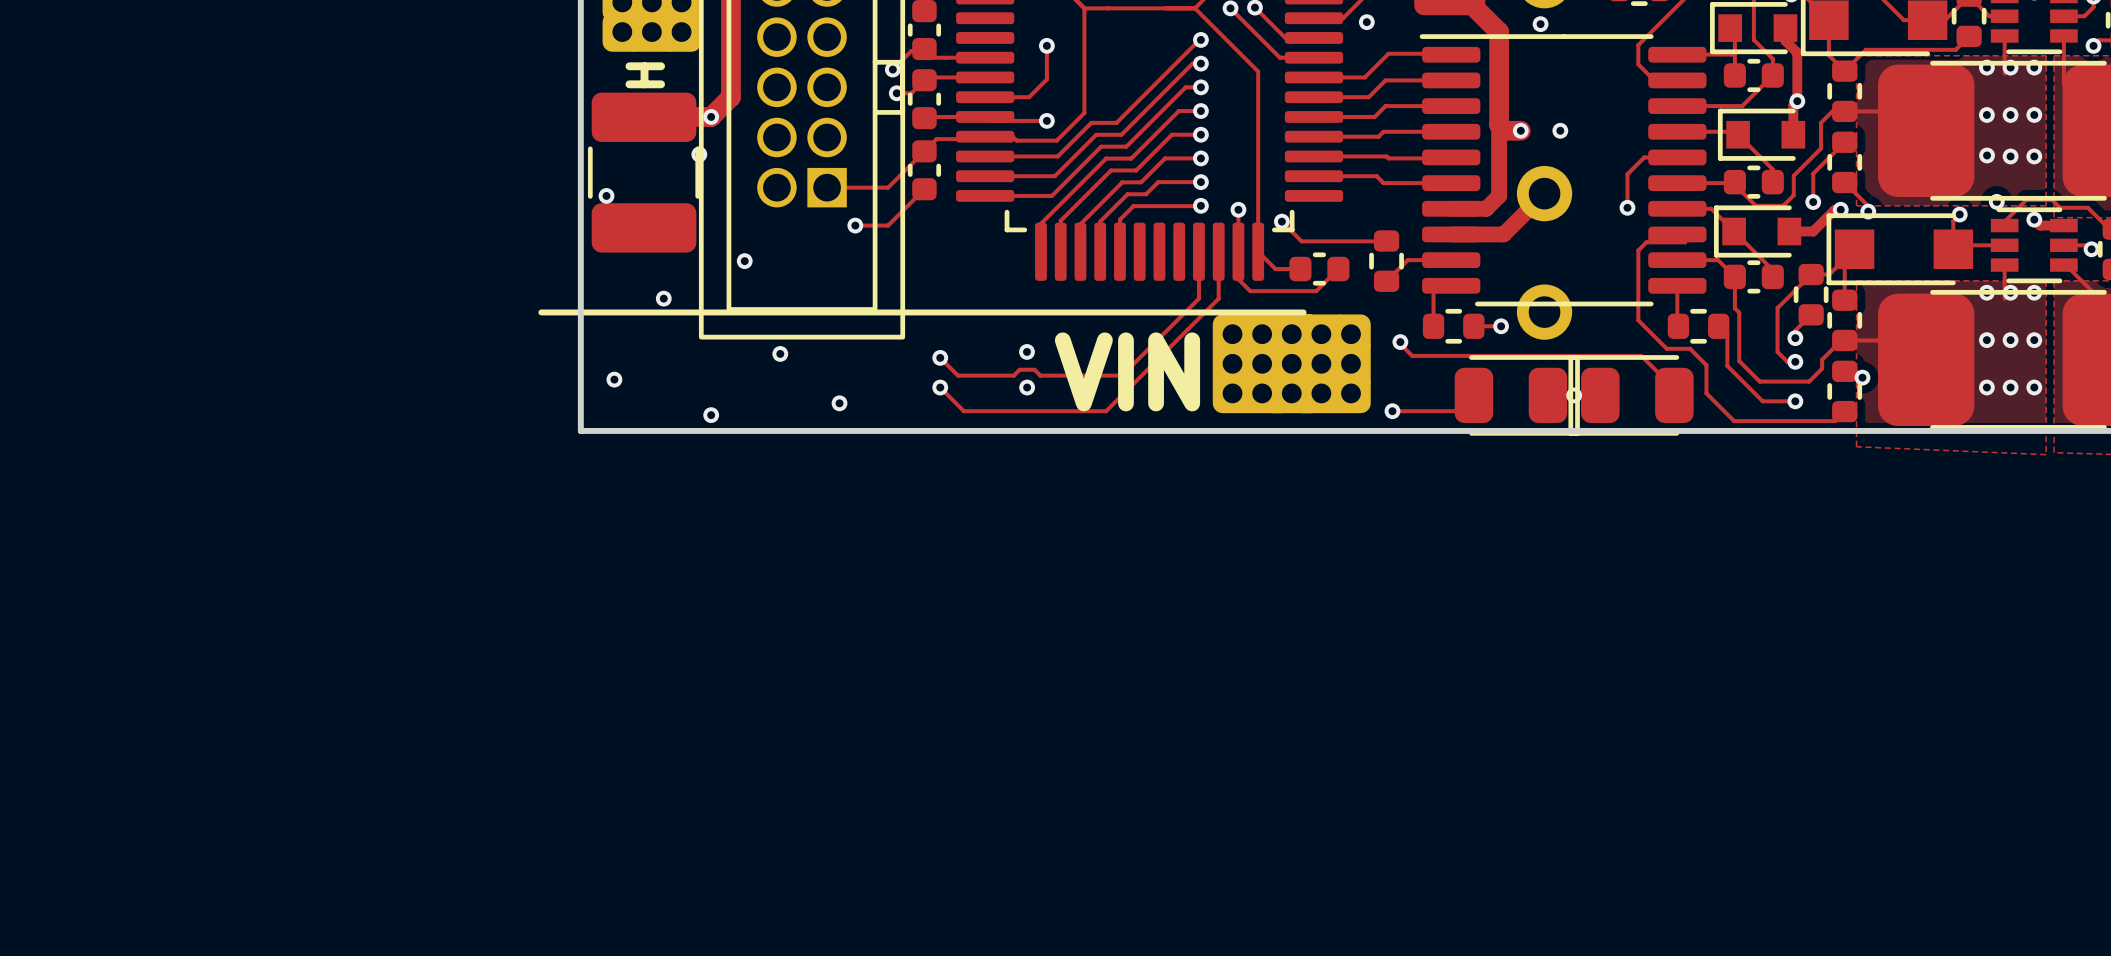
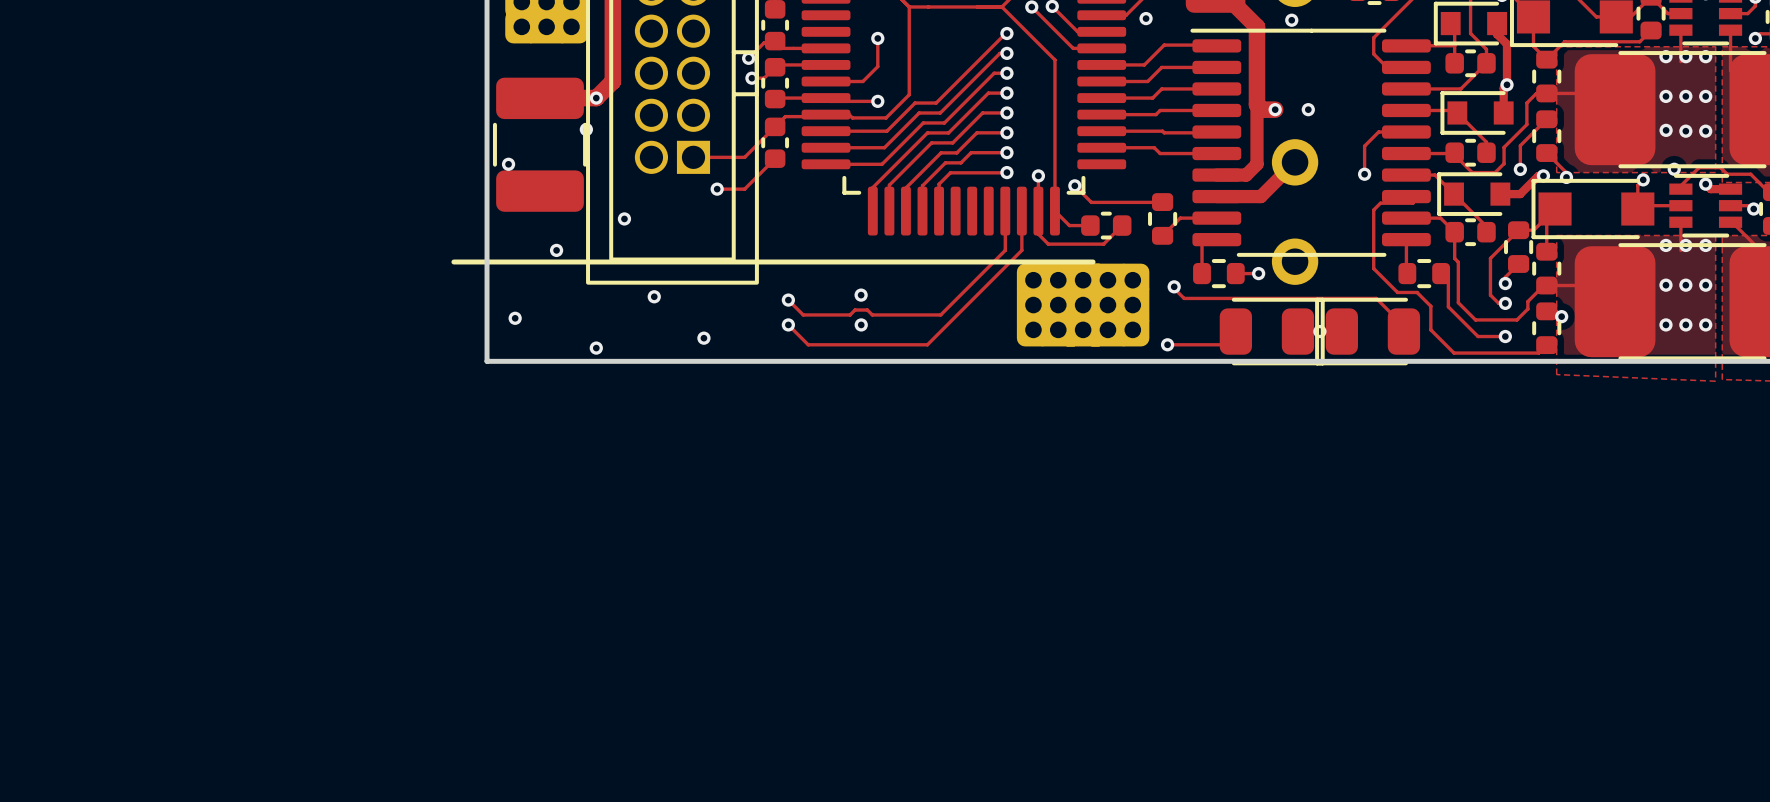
text: H (645, 75) -> none
text: VIN (1127, 371) -> none

